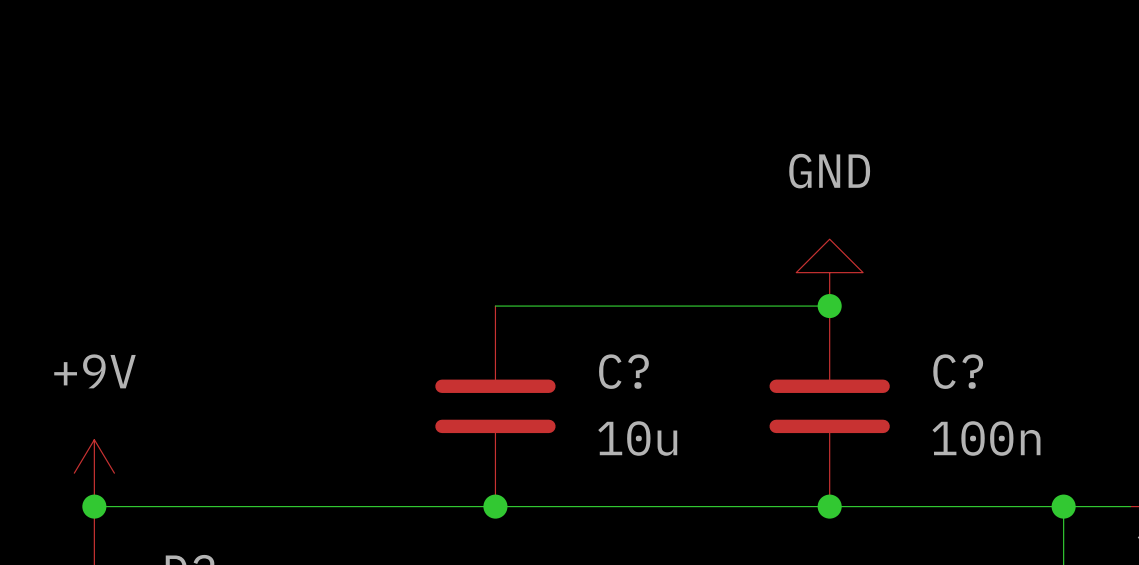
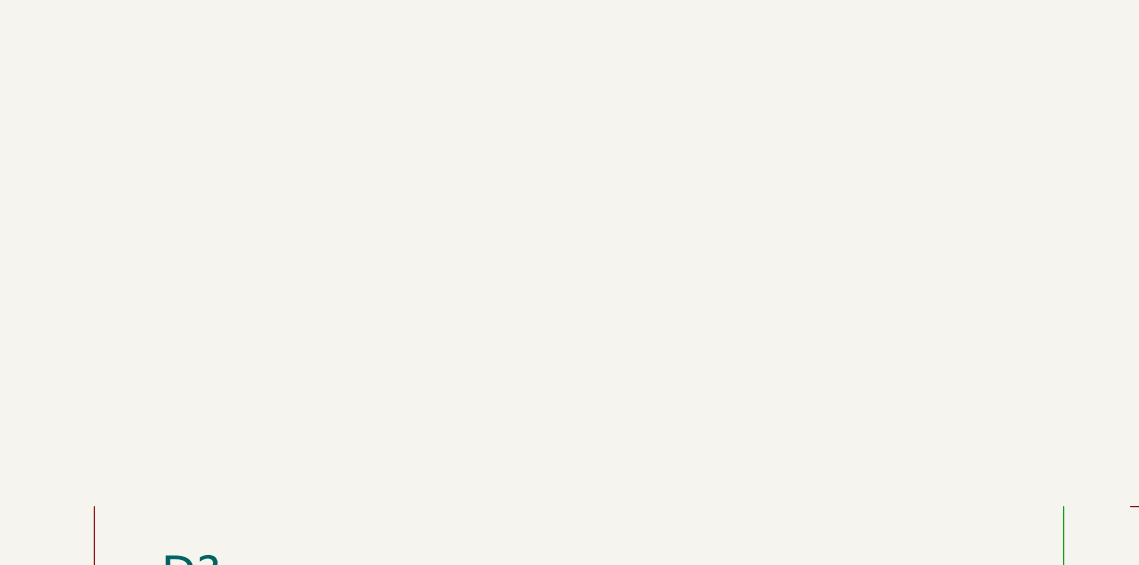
power symbol: GND (829, 272) -> none
wire: (495, 306) (829, 306) -> none
junction: (829, 306) -> none
C?: 10u (495, 406) -> none
C?: 100n (829, 406) -> none
power symbol: +9V (94, 473) -> none
wire: (94, 506) (1130, 506) -> none
junction: (94, 506) -> none
junction: (495, 506) -> none
junction: (829, 506) -> none
junction: (1063, 506) -> none

